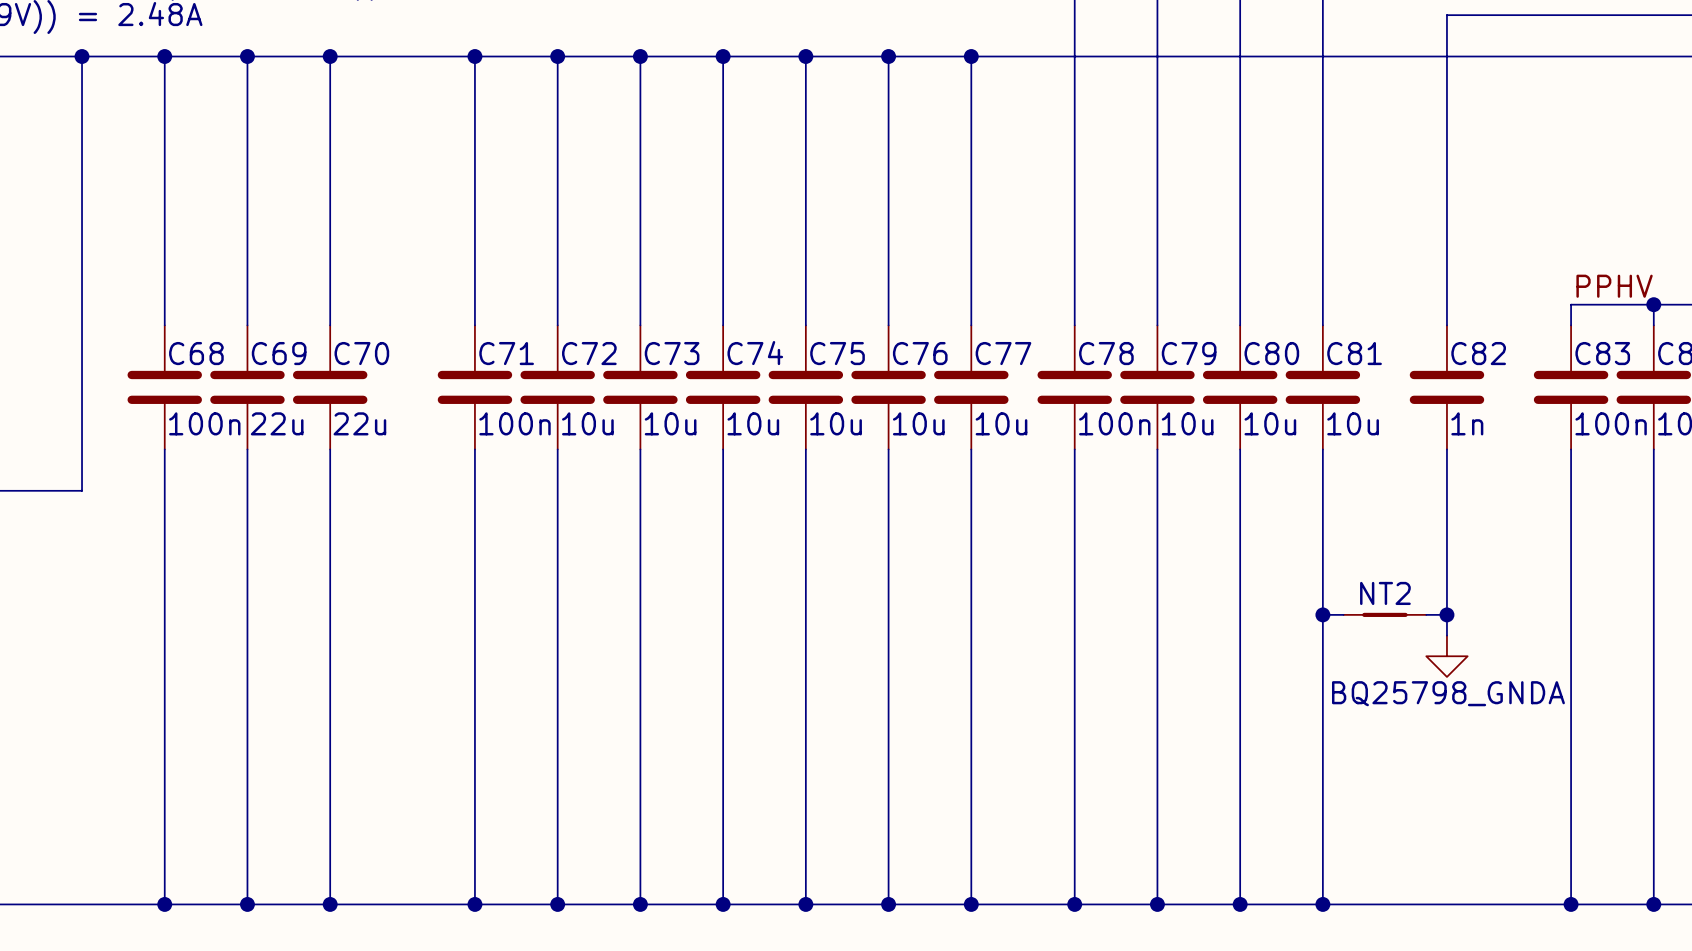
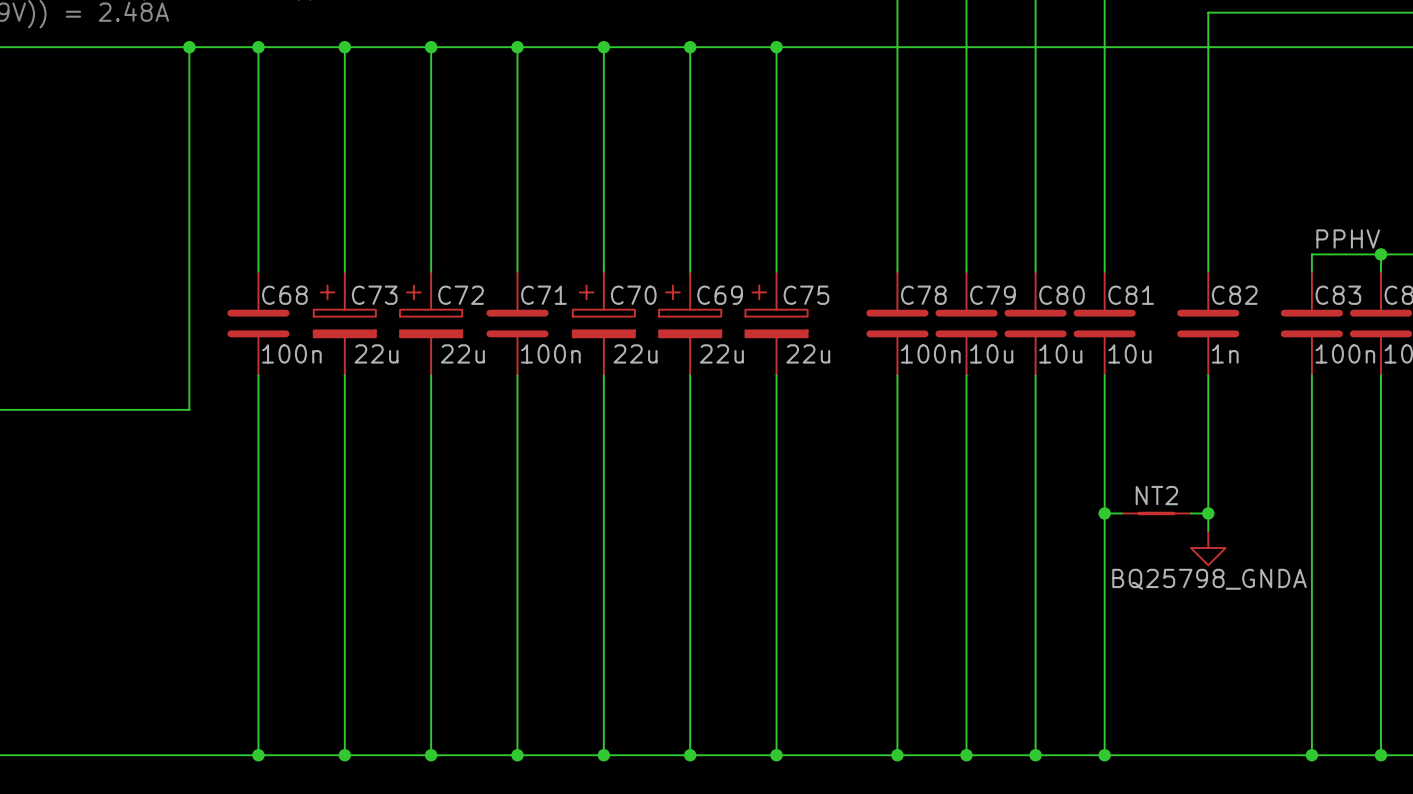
wire: (82, 56) (82, 490) -> (189, 47) (189, 409) (68, 409)
junction: (82, 56) -> none
wire: (164, 56) (164, 325) -> none
junction: (164, 56) -> none
wire: (247, 56) (247, 325) -> none
junction position: (247, 56) -> (189, 47)
wire: (330, 56) (330, 325) -> (258, 47) (258, 271)
junction position: (330, 56) -> (258, 47)
junction: none -> (344, 47)
wire: (474, 56) (474, 325) -> (431, 47) (431, 271)
junction: (474, 56) -> none
junction: none -> (431, 47)
wire: (557, 56) (557, 325) -> (344, 47) (344, 271)
junction: (557, 56) -> none
wire: (640, 56) (640, 325) -> (517, 47) (517, 271)
junction position: (640, 56) -> (517, 47)
wire: (805, 56) (805, 325) -> none
junction position: (805, 56) -> (690, 47)
wire: (888, 56) (888, 325) -> (776, 47) (776, 271)
junction: (888, 56) -> none
junction: none -> (776, 47)
wire: (971, 56) (971, 325) -> (690, 47) (690, 271)
junction: (971, 56) -> none
C69 symbol: [210, 325, 285, 450] -> [659, 271, 722, 376]
C70 symbol: [292, 325, 368, 450] -> [572, 271, 635, 376]
C72 symbol: [520, 325, 595, 450] -> [400, 271, 463, 376]
C73 symbol: [603, 325, 678, 450] -> [313, 271, 376, 376]
C75 symbol: [768, 325, 844, 450] -> [745, 271, 808, 376]
C68 position: (164, 387) -> (258, 323)
C71 position: (474, 387) -> (517, 323)
C74: 10u (723, 387) -> none
C76: 10u (888, 387) -> none
C77: 10u (971, 387) -> none
C72 value: 10u (587, 423) -> 22u (462, 353)
C73 value: 10u (670, 423) -> 22u (376, 353)
C75 value: 10u (836, 423) -> 22u (808, 353)
wire: (164, 449) (164, 904) -> none
wire: (247, 449) (247, 904) -> none
wire: (330, 449) (330, 904) -> (258, 375) (258, 755)
wire: (474, 449) (474, 904) -> (431, 375) (431, 755)
wire: (557, 449) (557, 904) -> (344, 375) (344, 755)
wire: (640, 449) (640, 904) -> (517, 375) (517, 755)
wire: (805, 449) (805, 904) -> none
wire: (888, 449) (888, 904) -> (776, 375) (776, 755)
wire: (971, 449) (971, 904) -> (690, 375) (690, 755)
junction: (164, 904) -> none
junction: (247, 904) -> none
junction position: (330, 904) -> (258, 755)
junction: none -> (344, 755)
junction: (474, 904) -> none
junction: none -> (431, 755)
junction: (557, 904) -> none
junction position: (640, 904) -> (517, 755)
junction position: (805, 904) -> (690, 755)
junction: (888, 904) -> none
junction: none -> (776, 755)
junction: (971, 904) -> none

